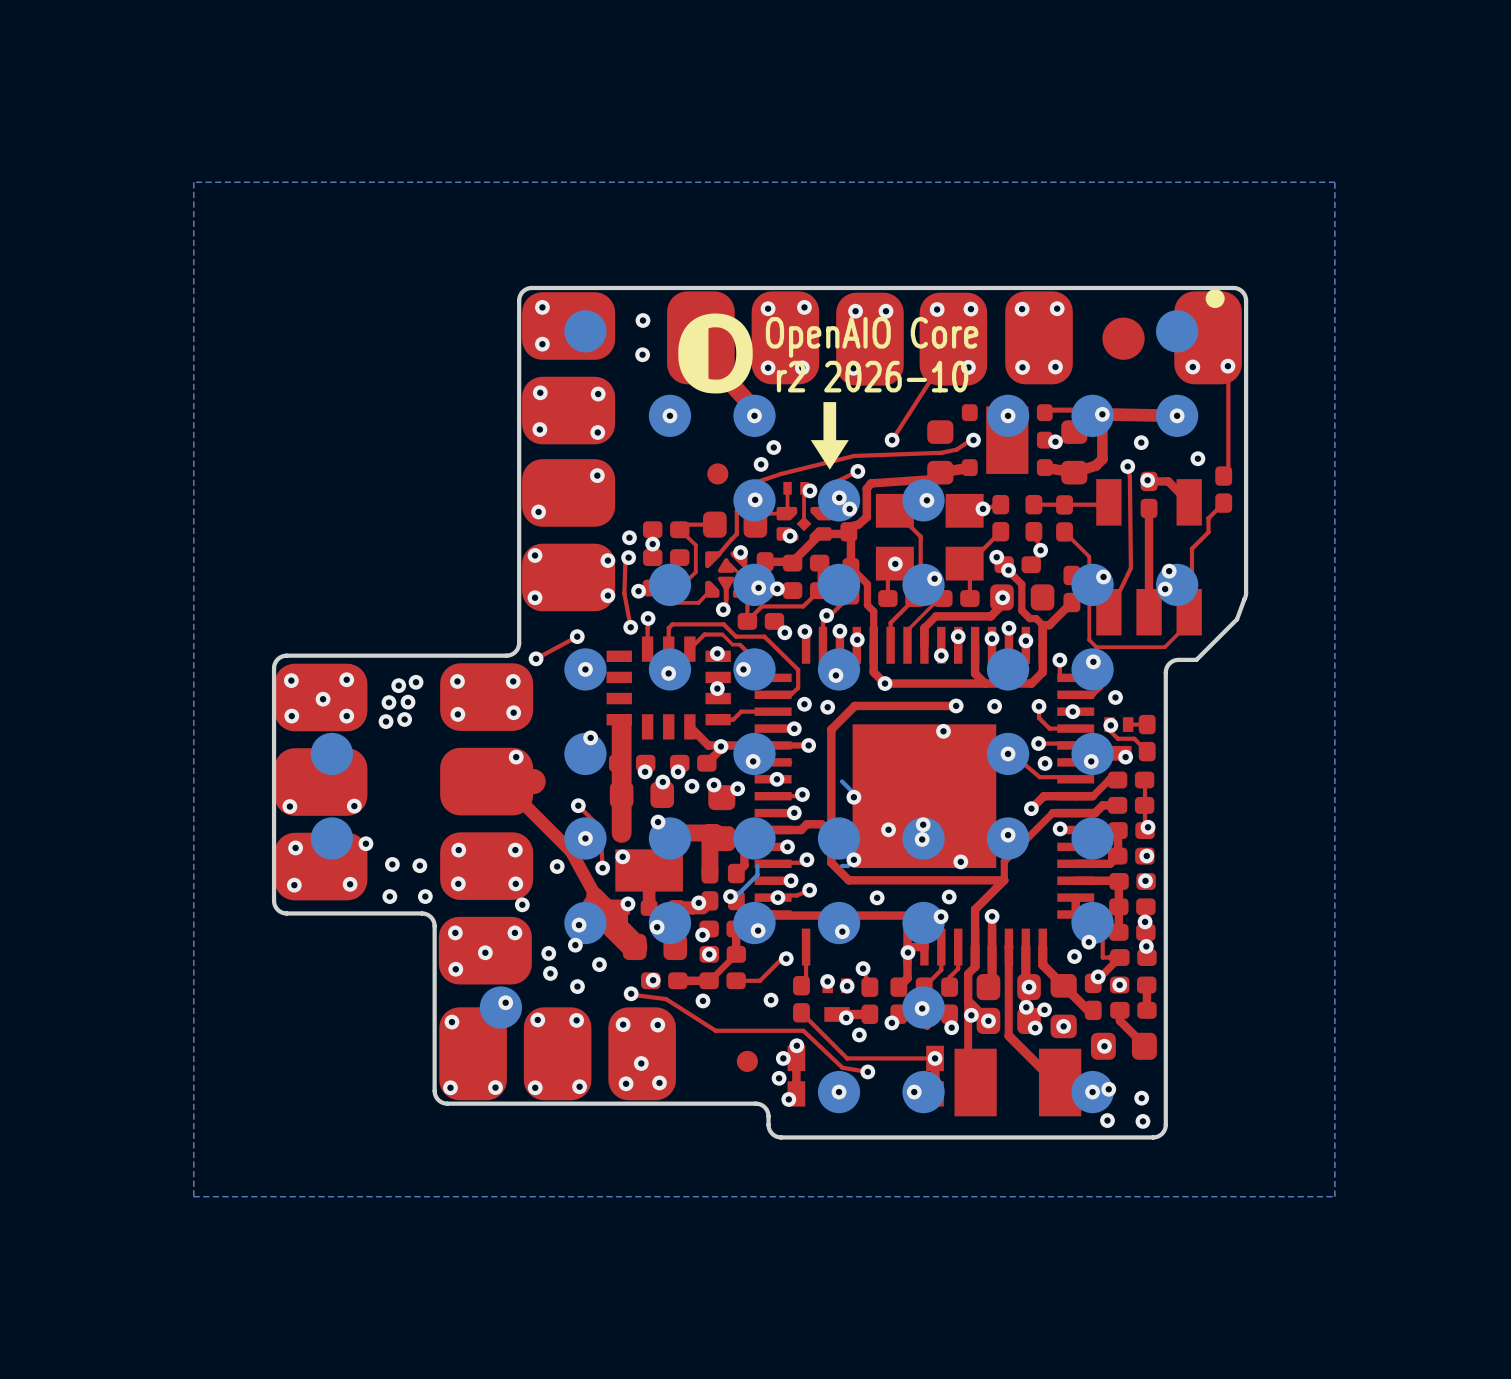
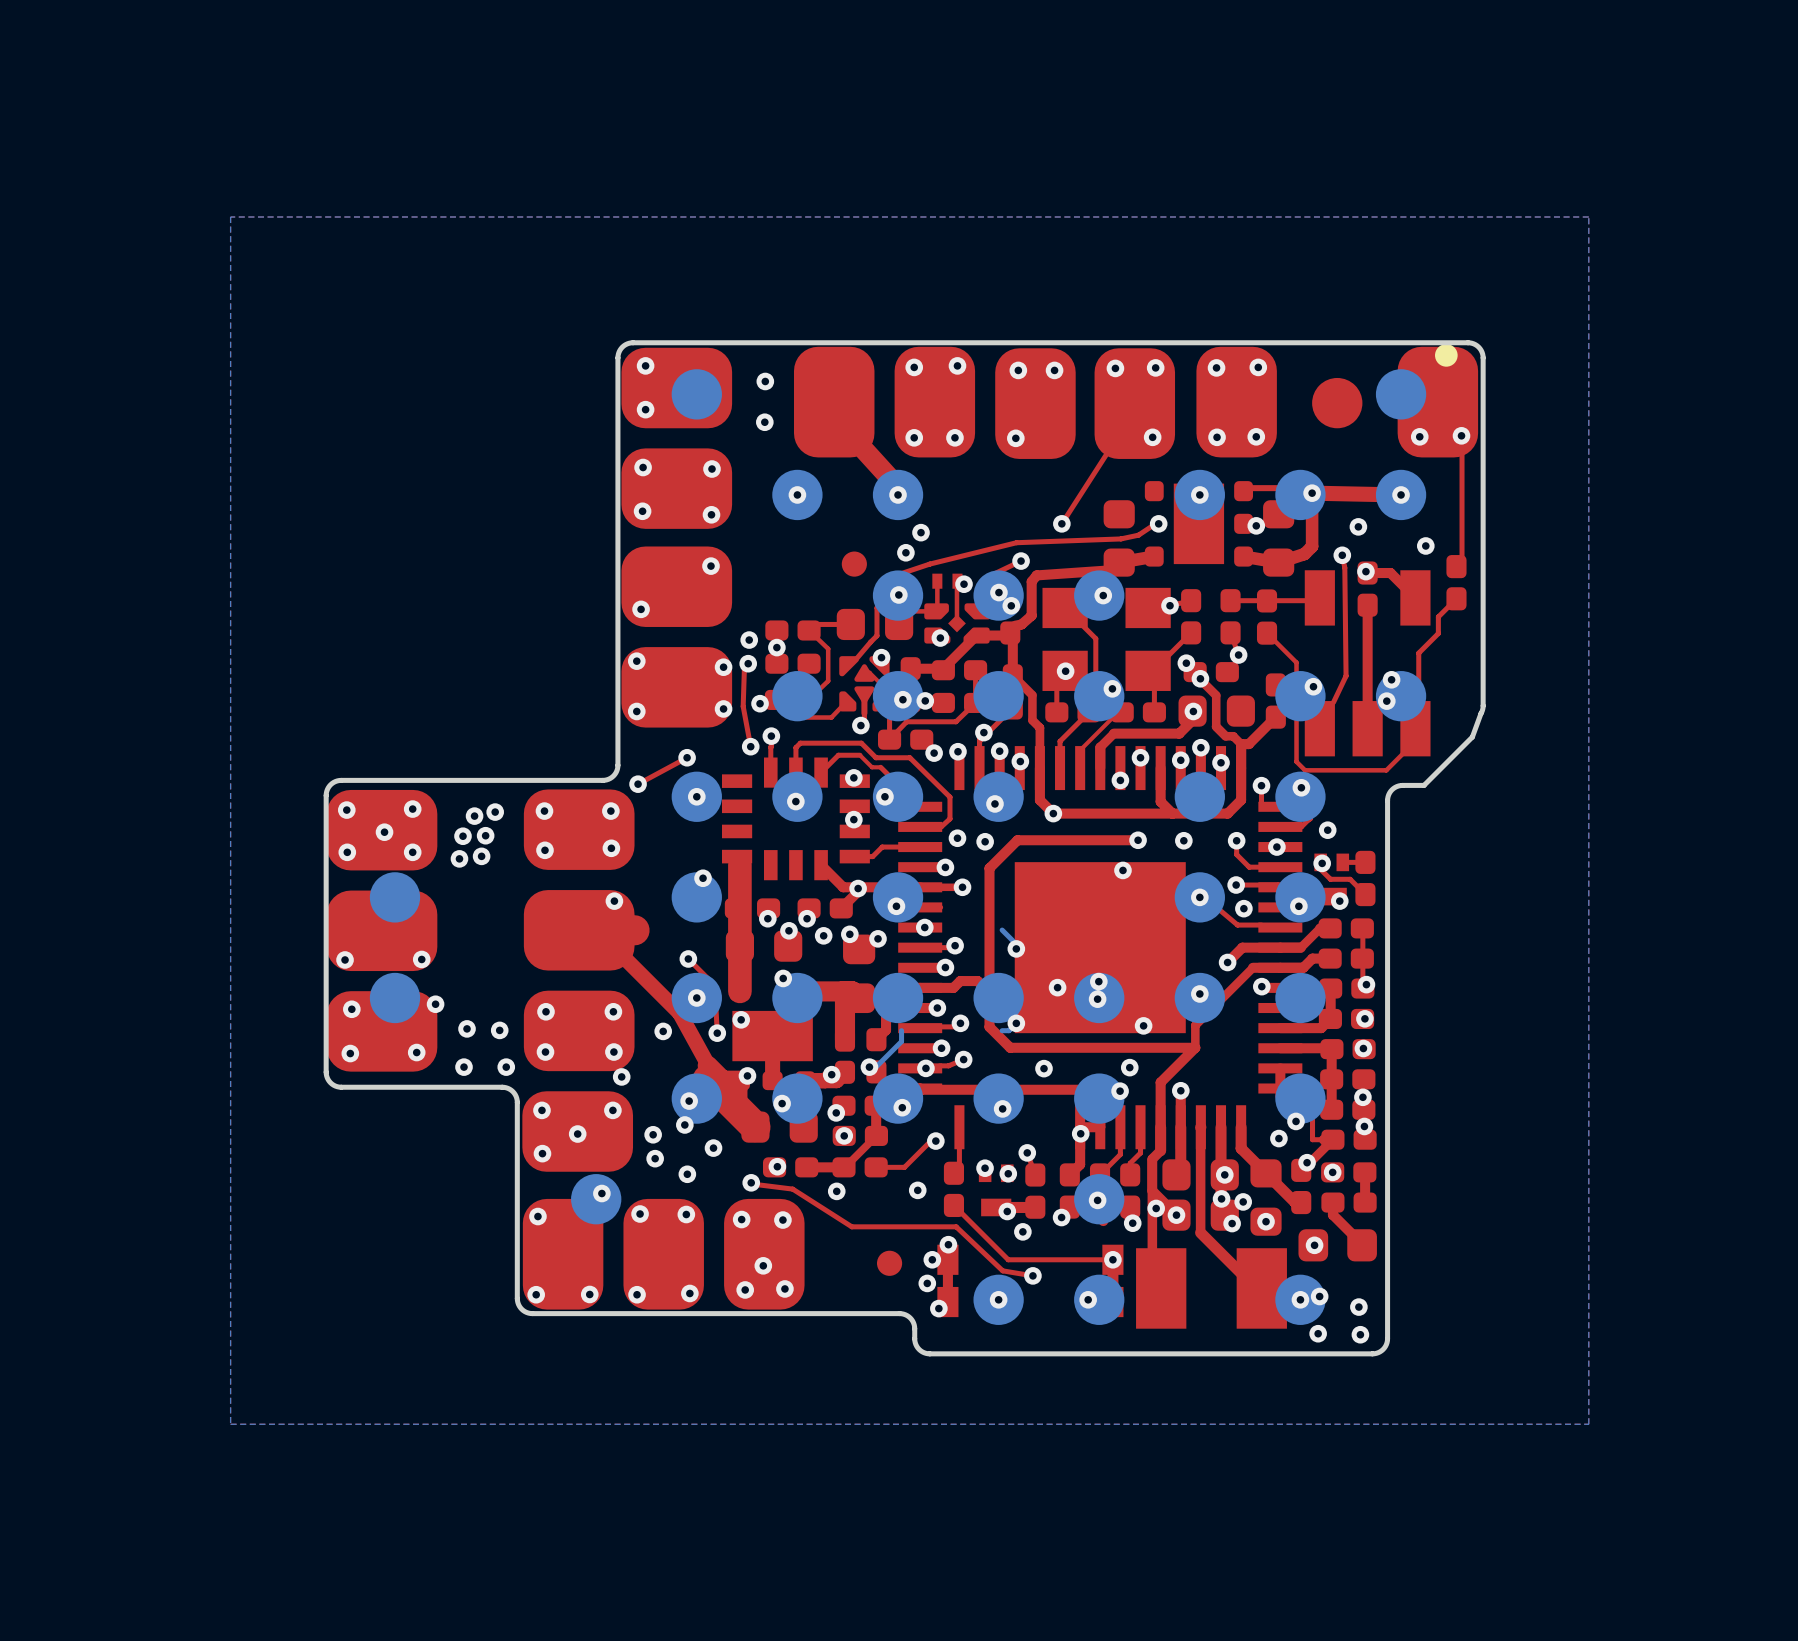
drawing: [678, 313, 753, 394] -> none
text: OpenAIO Core (872, 337) -> none
text: r2 2026-10 (872, 376) -> none
drawing: [810, 402, 849, 470] -> none

